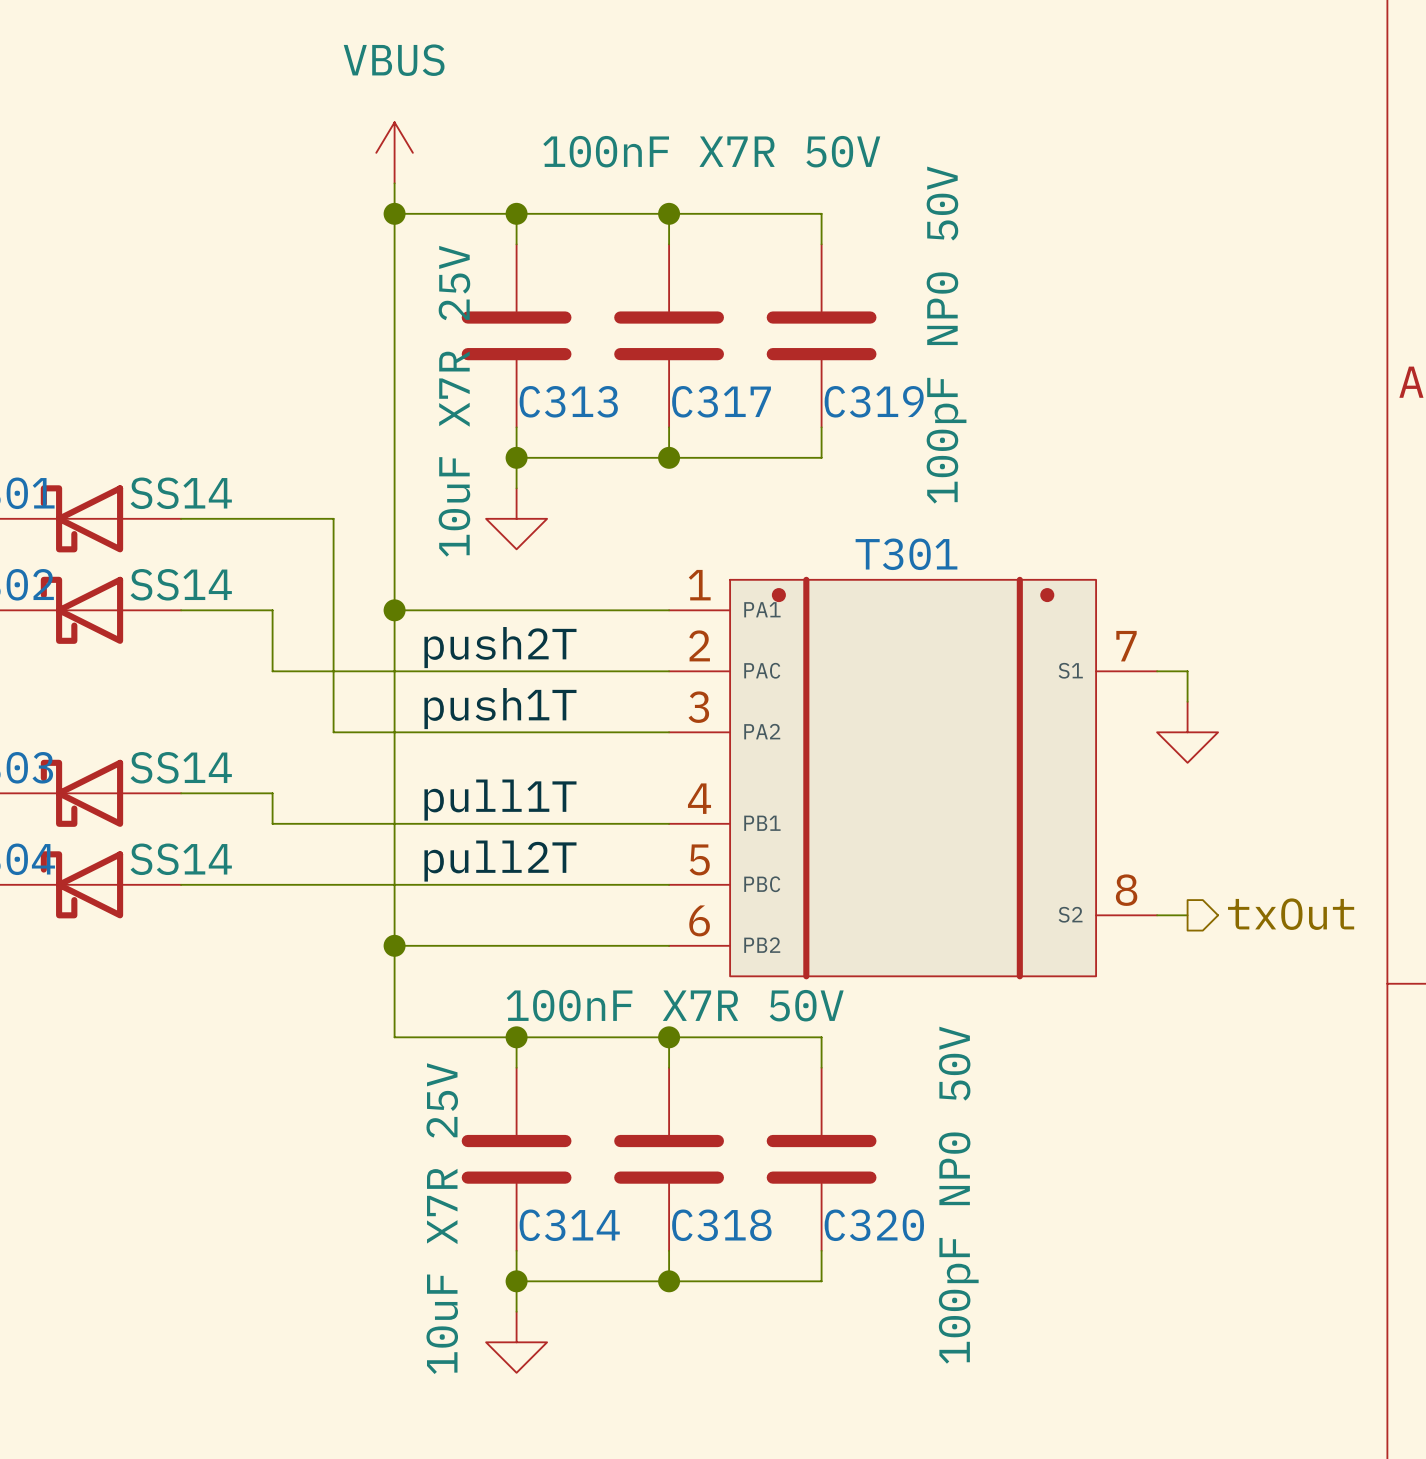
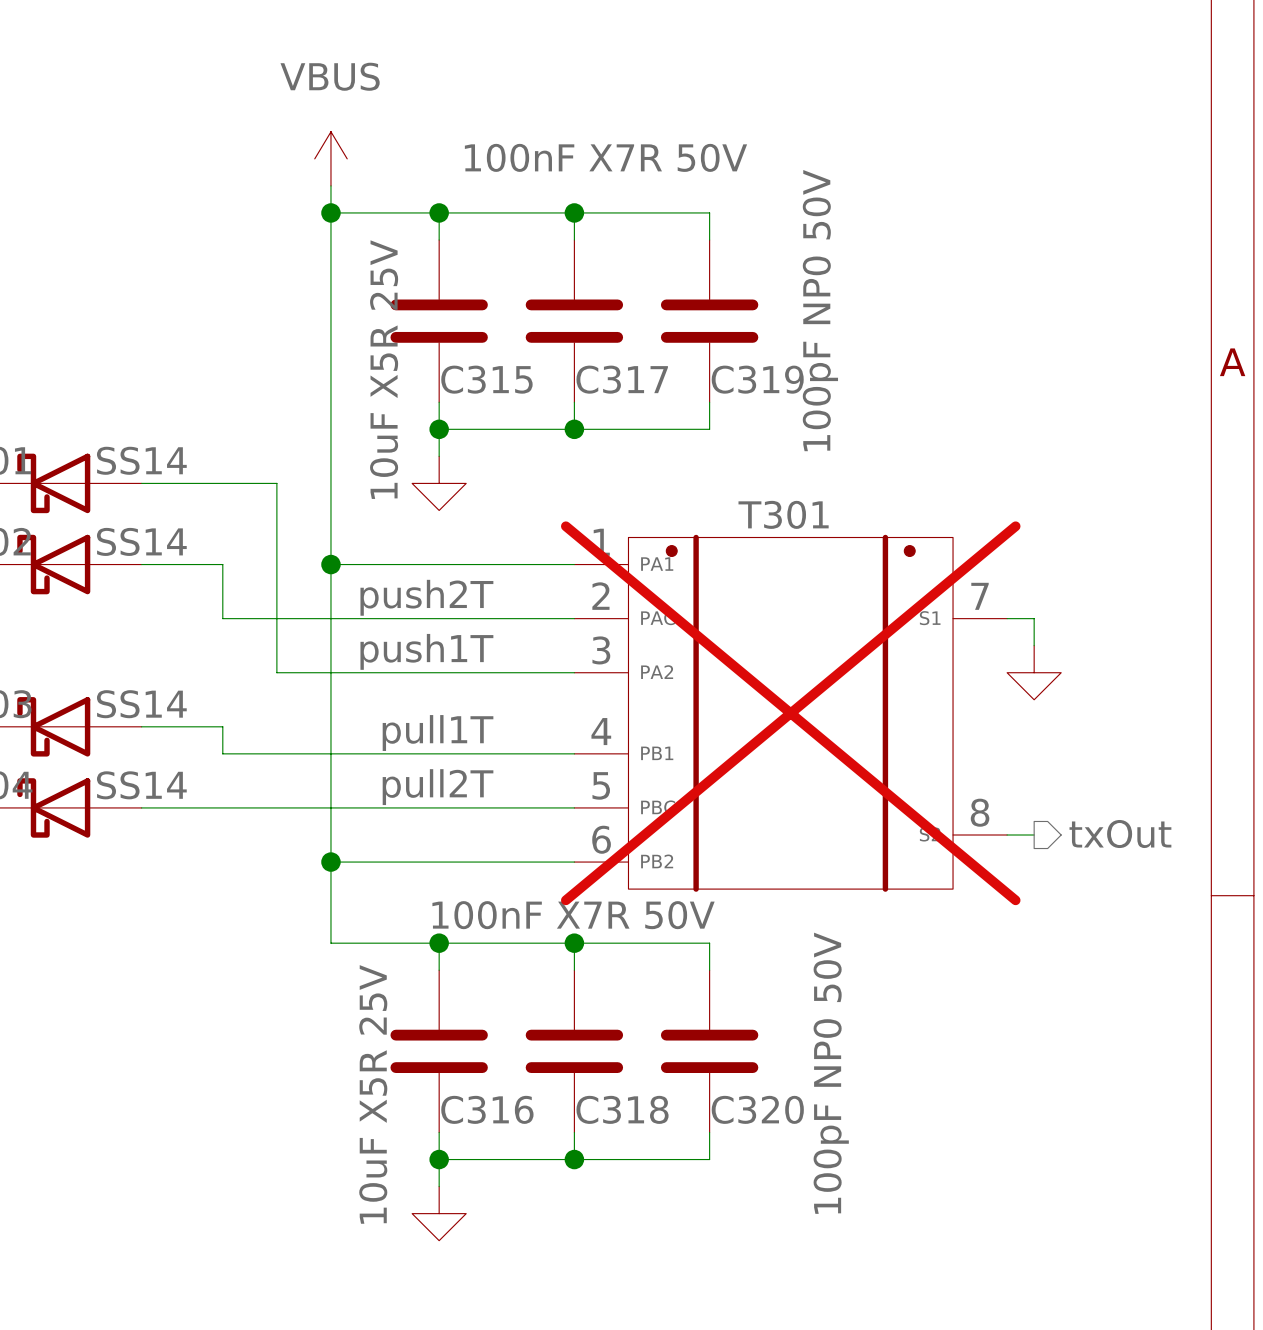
C313 value: 10uF X7R 25V (454, 401) -> 10uF X5R 25V (384, 369)
C313 name: C313 (568, 401) -> C315 (486, 379)
T301 do-not-place cross: none -> (790, 713)
C314 value: 10uF X7R 25V (442, 1218) -> 10uF X5R 25V (373, 1094)
C314 name: C314 (569, 1225) -> C316 (487, 1109)

